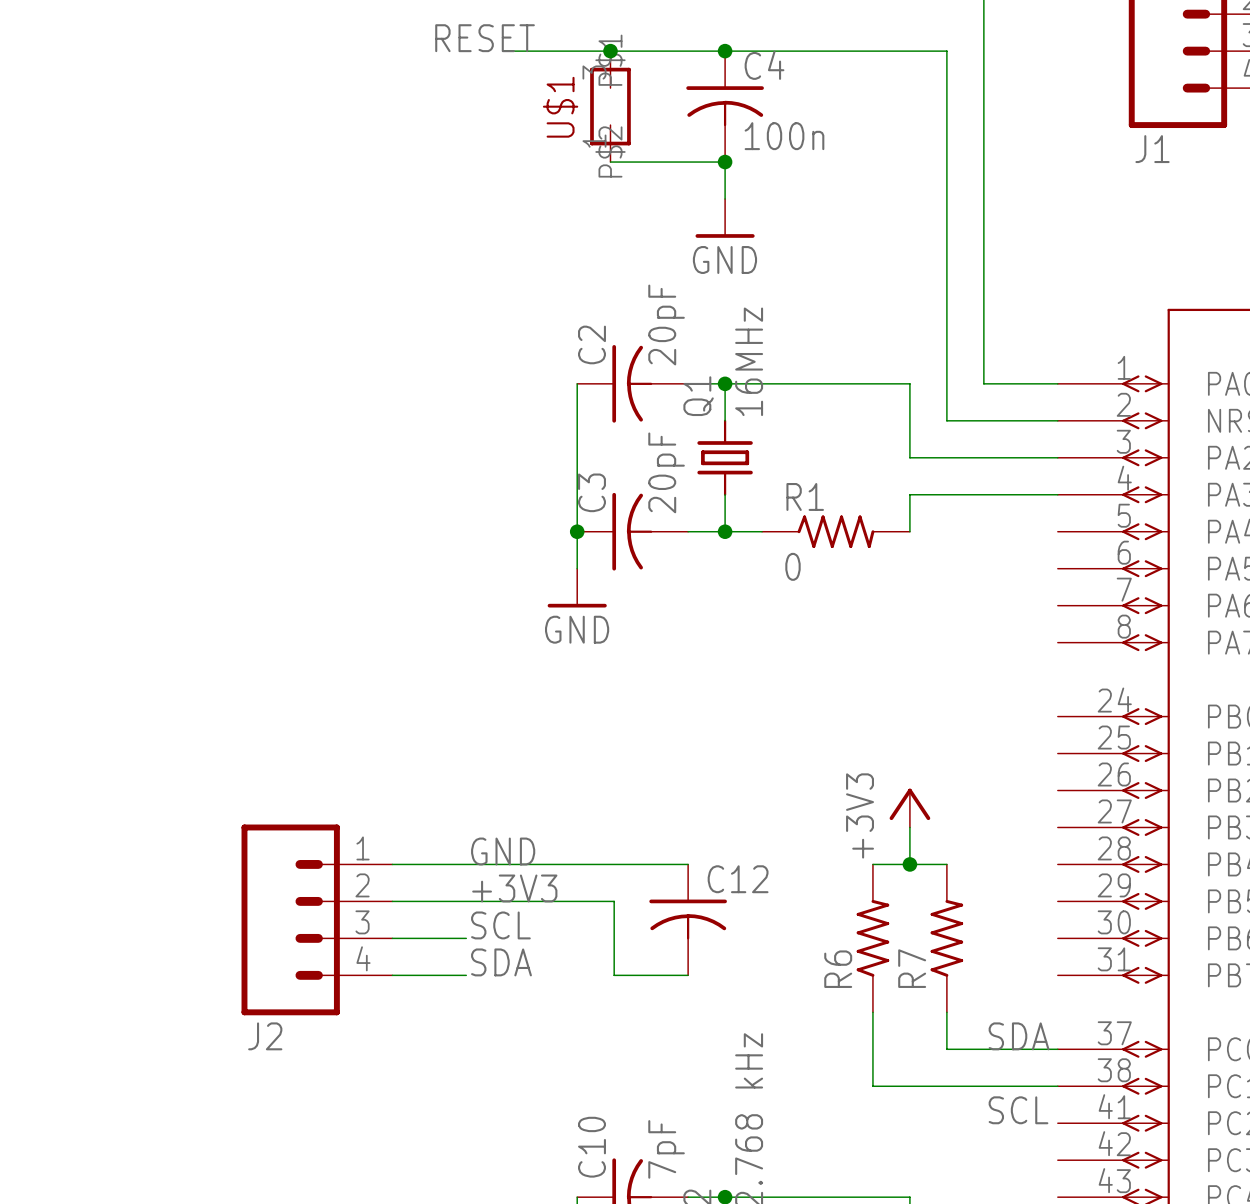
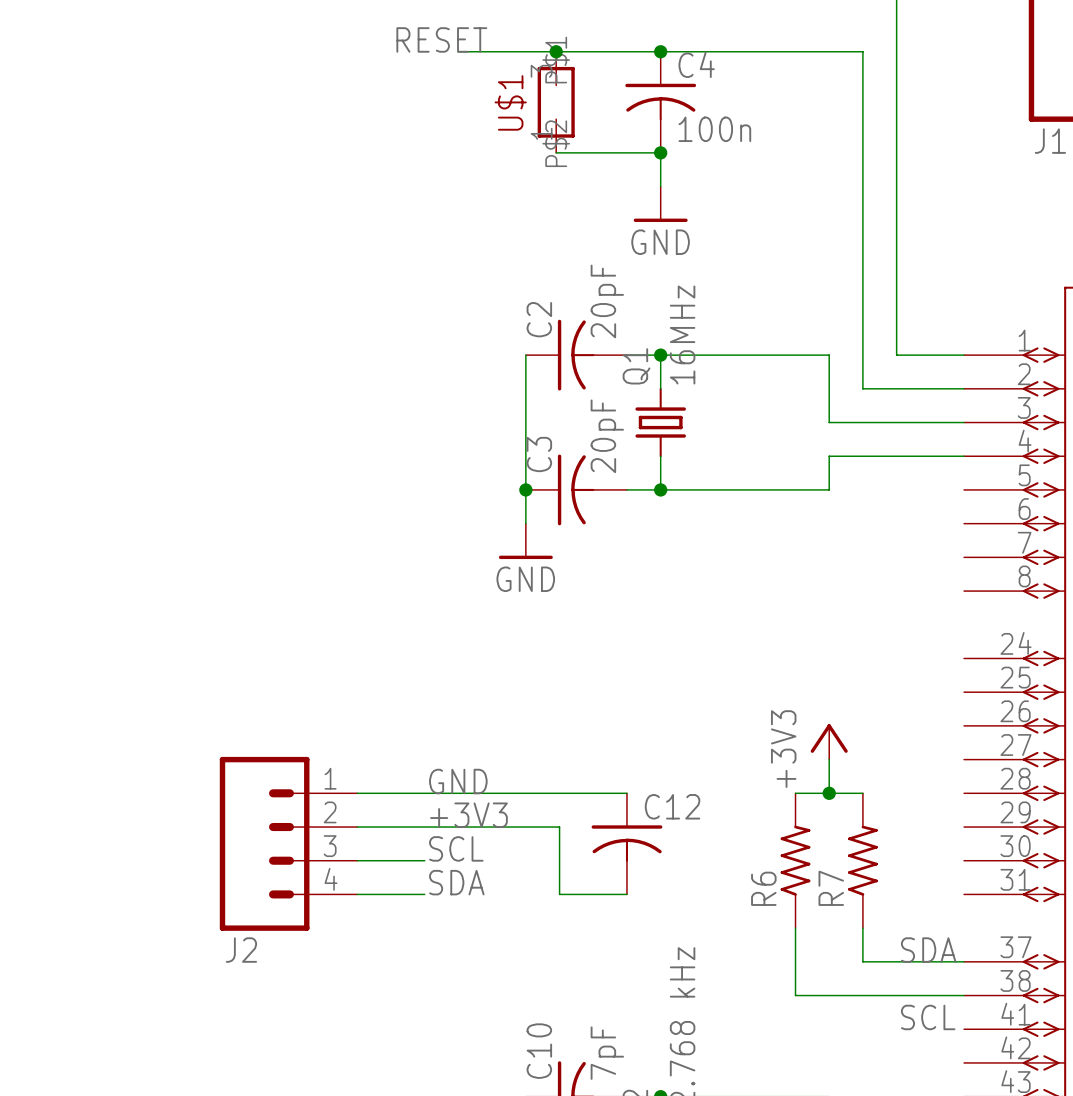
R1: 0 (835, 531) -> none

